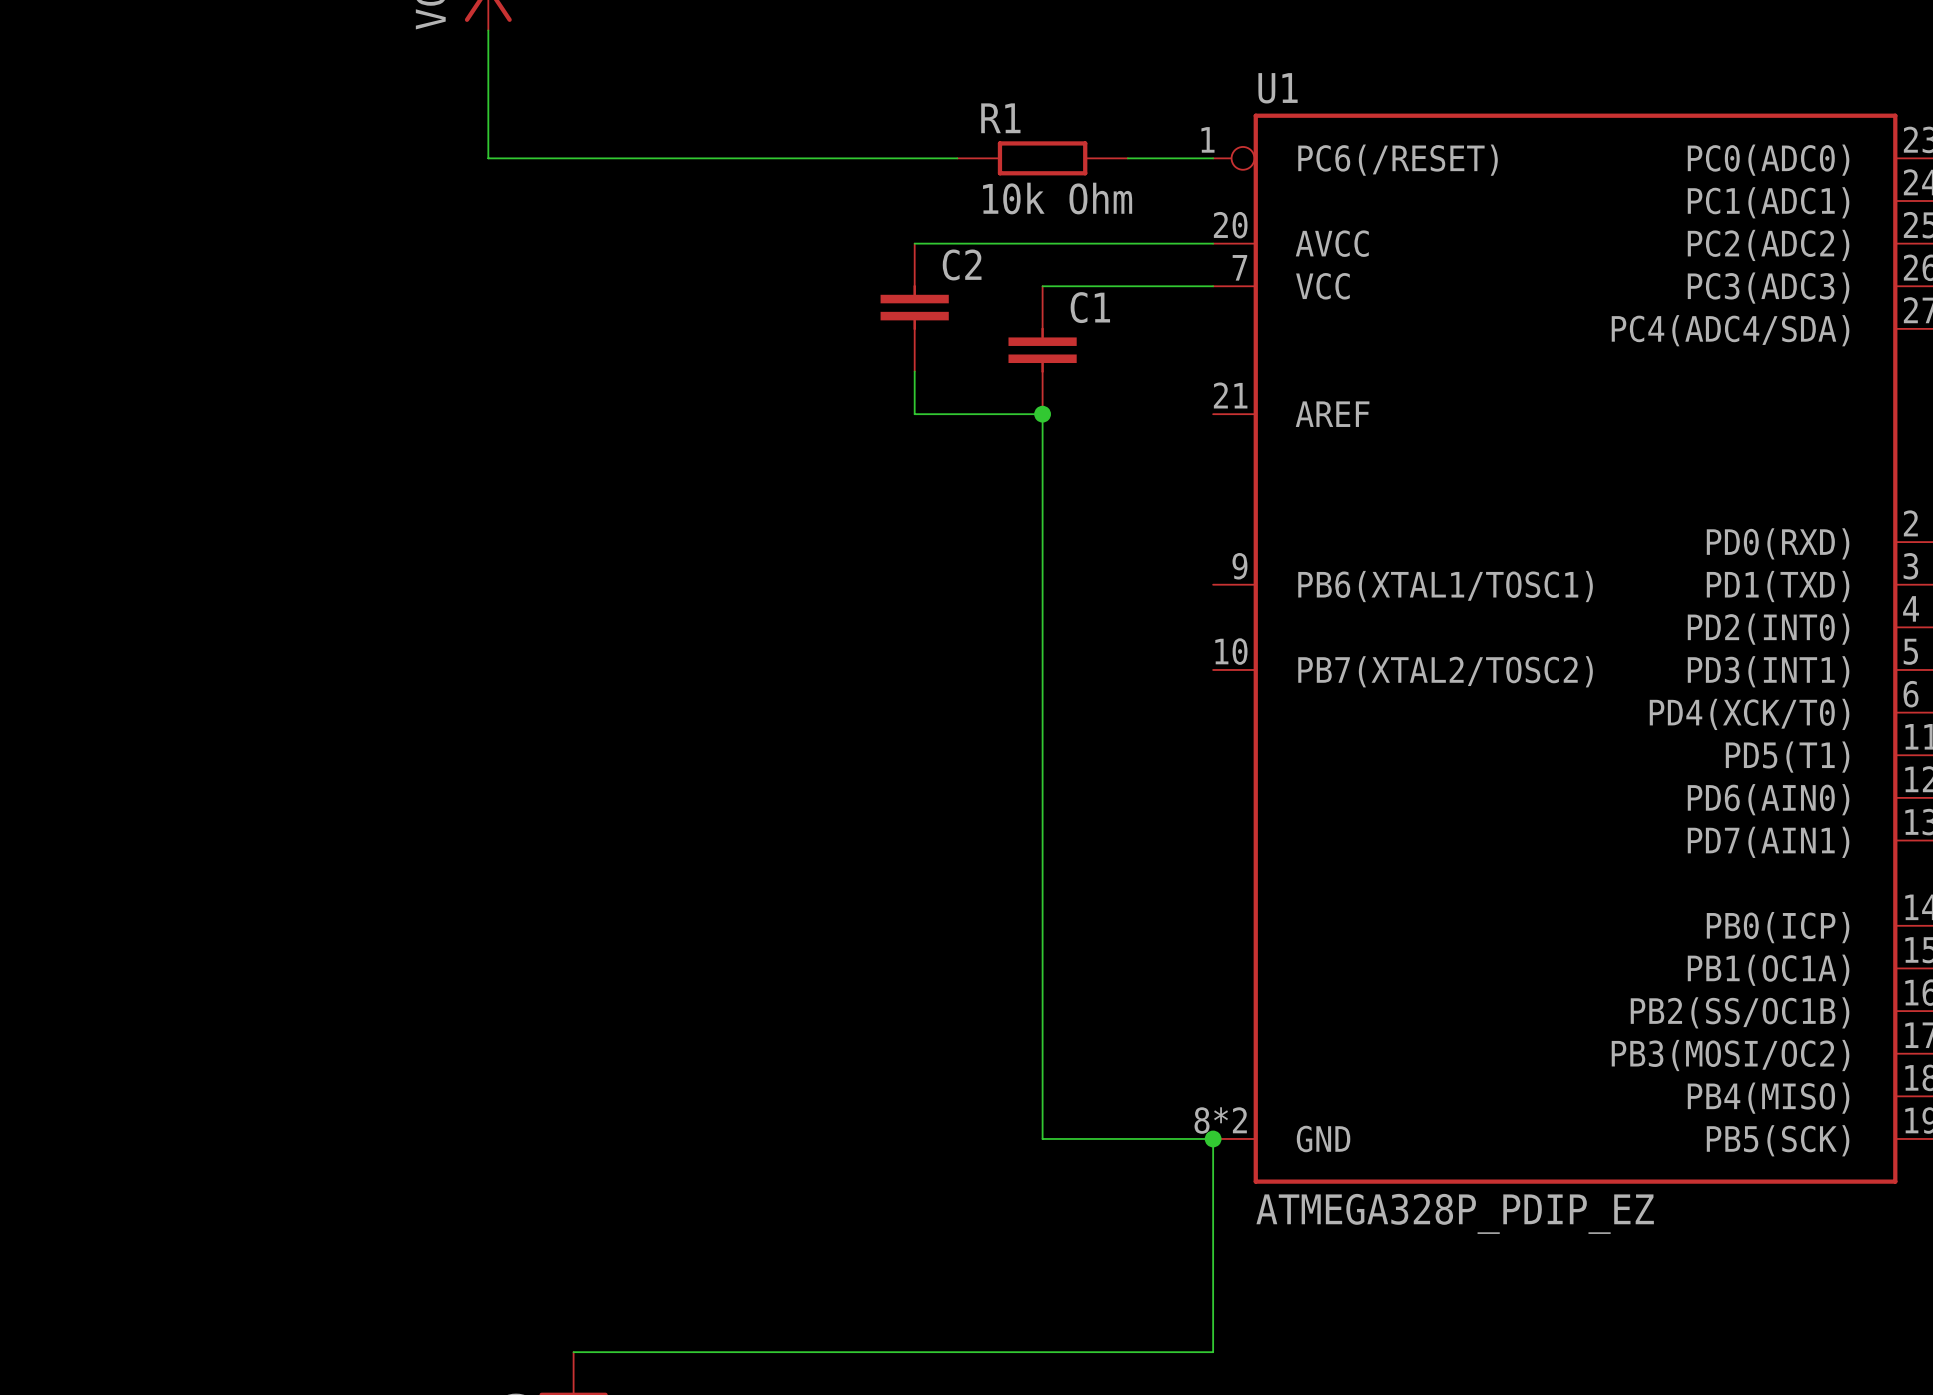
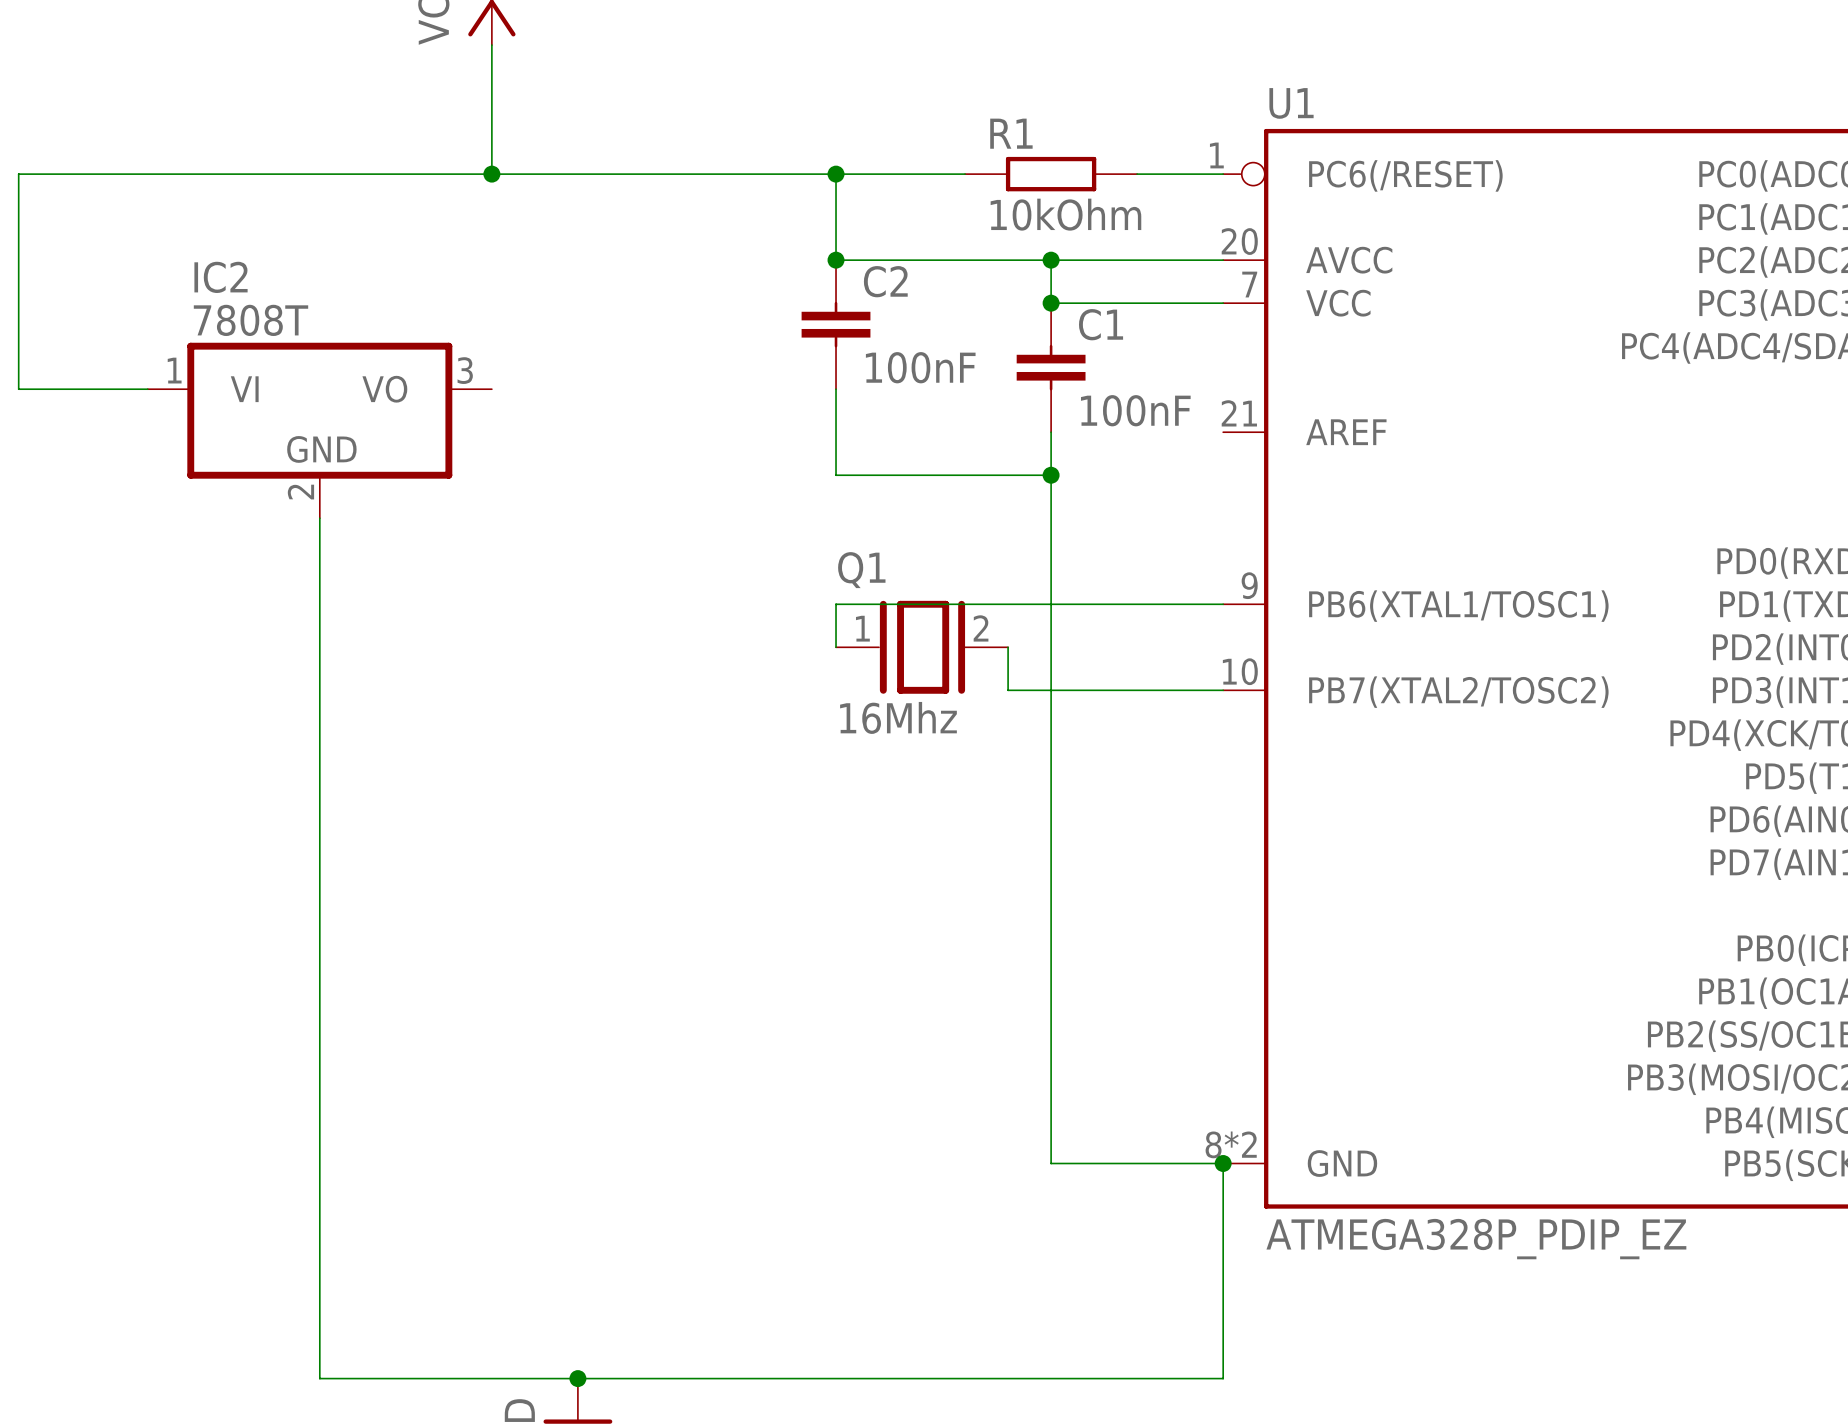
wire: none -> (491, 174) (18, 174) (18, 389) (147, 389)
junction: none -> (491, 174)
wire: none -> (836, 174) (836, 260) (922, 260)
junction: none -> (836, 174)
R1 value: 10k Ohm (1057, 198) -> 10kOhm (1065, 214)
junction: none -> (836, 260)
wire: none -> (1051, 260) (1051, 303)
junction: none -> (1051, 260)
junction: none -> (1051, 303)
C2 position: (914, 307) -> (836, 324)
C2 value: none -> 100nF (920, 367)
wire: none -> (836, 389) (836, 475) (1051, 475)
wire: (914, 371) (914, 414) (1042, 414) -> none
C1 value: none -> 100nF (1135, 410)
IC2: none -> 7808T (319, 430)
junction position: (1042, 414) -> (1051, 475)
wire: none -> (319, 518) (319, 1378) (577, 1378)
wire: none -> (1223, 604) (836, 604) (836, 647)
Q1: none -> 16Mhz (922, 647)
wire: none -> (1008, 647) (1008, 690) (1223, 690)
junction: none -> (577, 1378)

